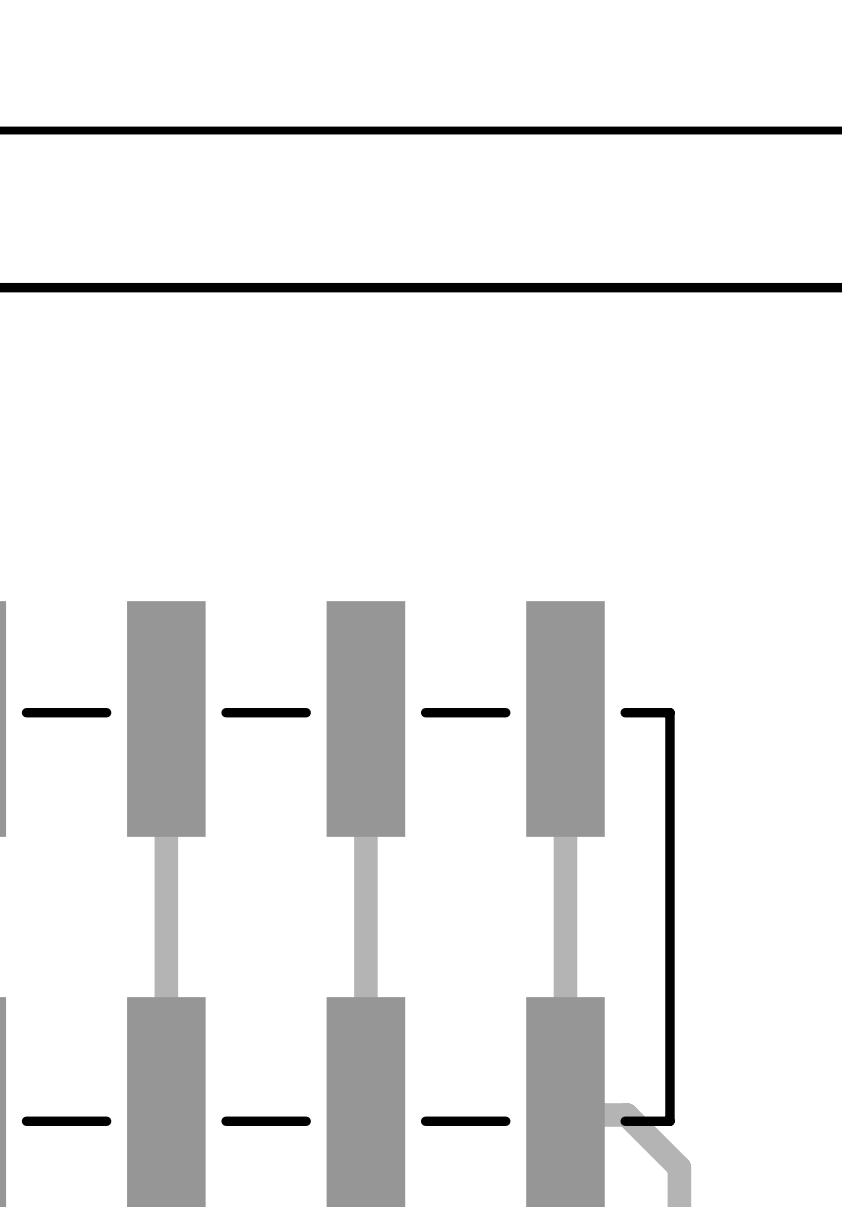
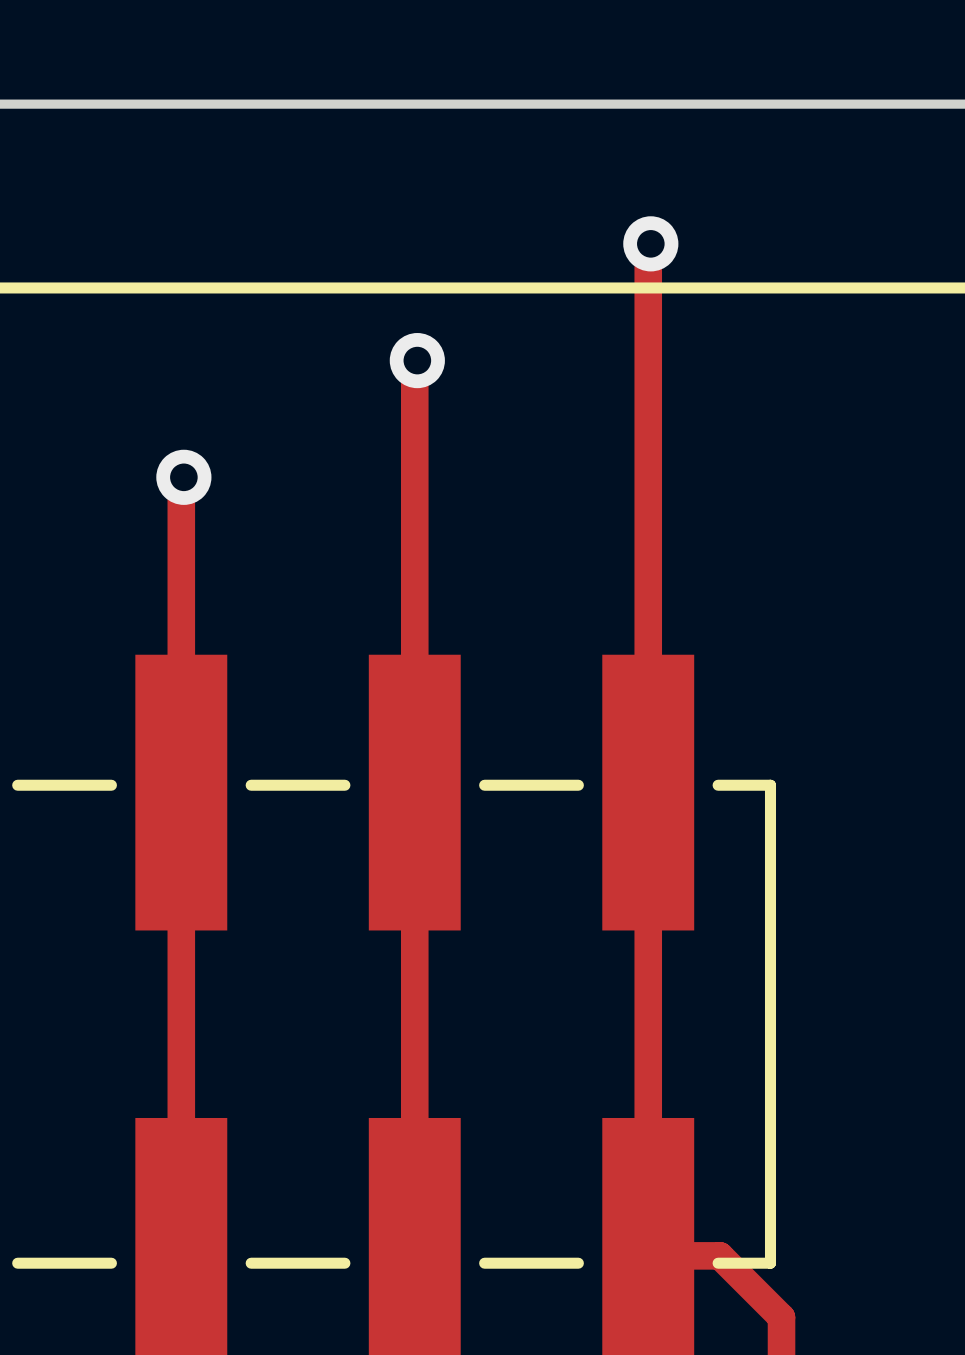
track: none -> (650, 243) (648, 246) (648, 792)
via: none -> (650, 243)
track: none -> (417, 360) (414, 363) (414, 792)
via: none -> (417, 360)
track: none -> (183, 477) (181, 479) (181, 792)
via: none -> (183, 477)

